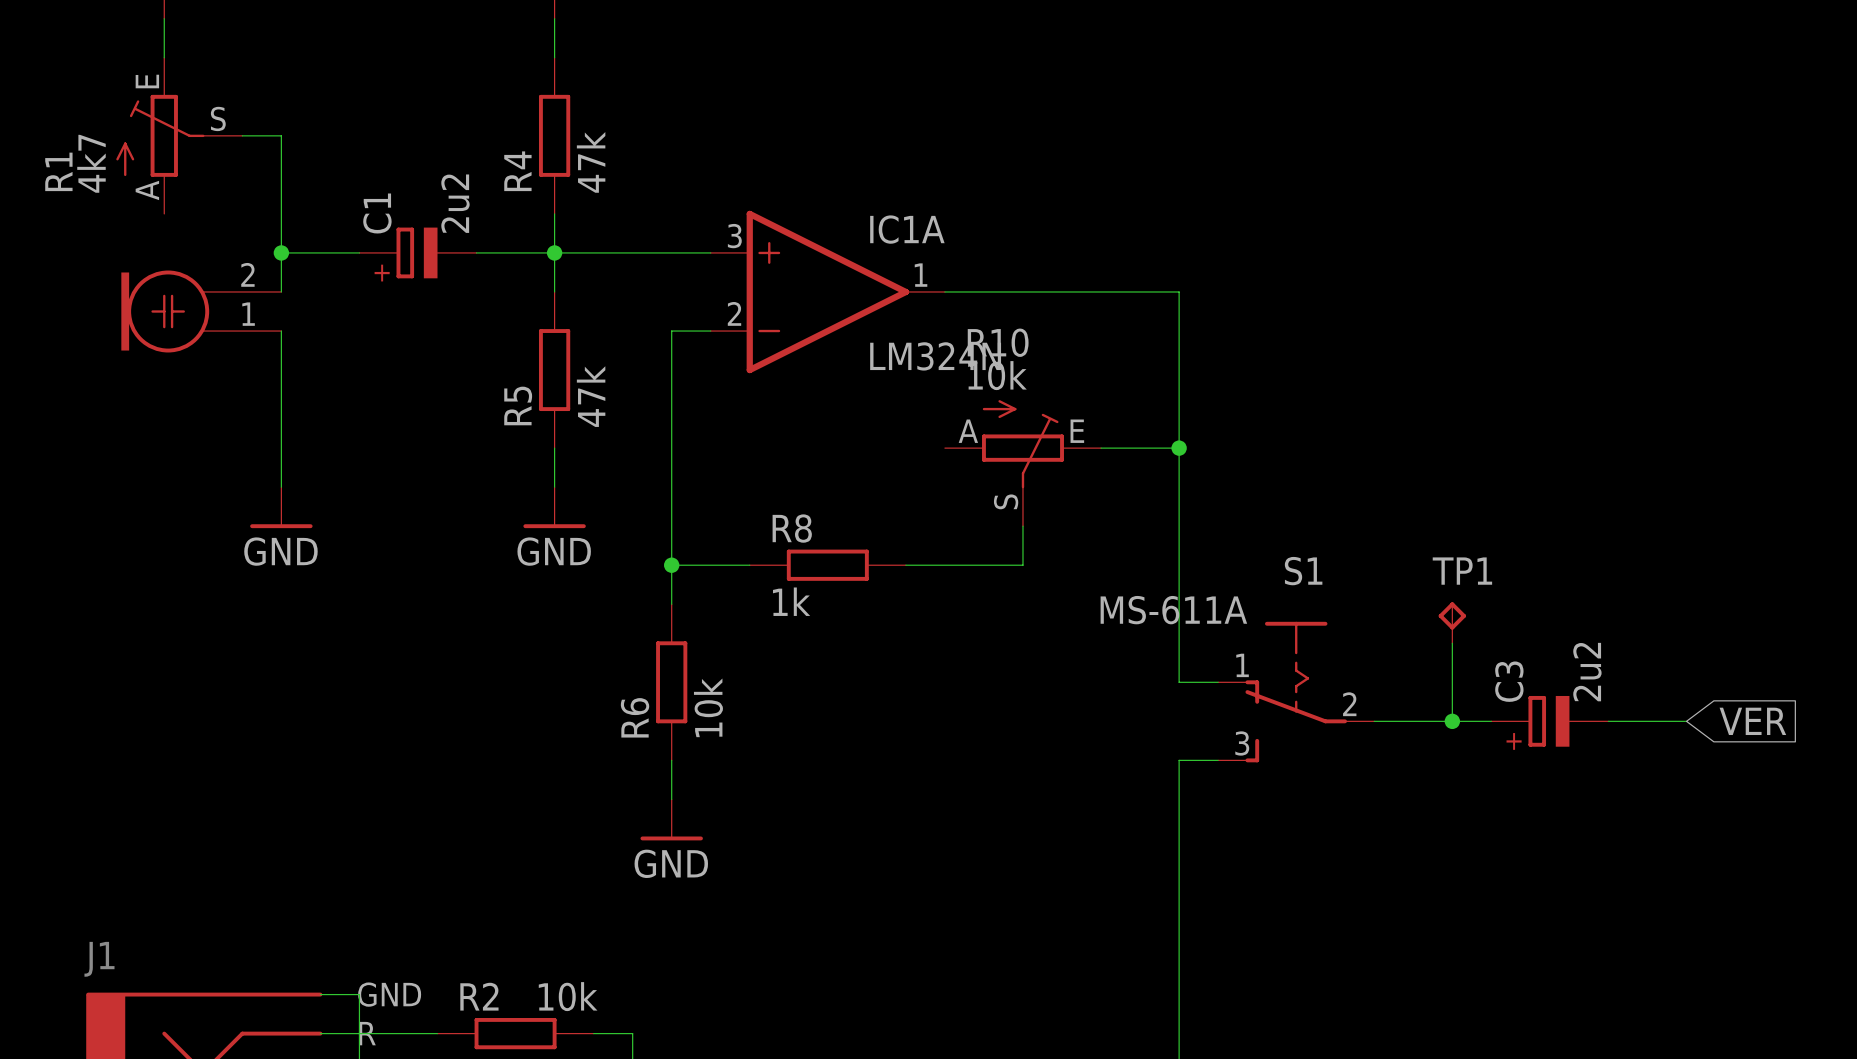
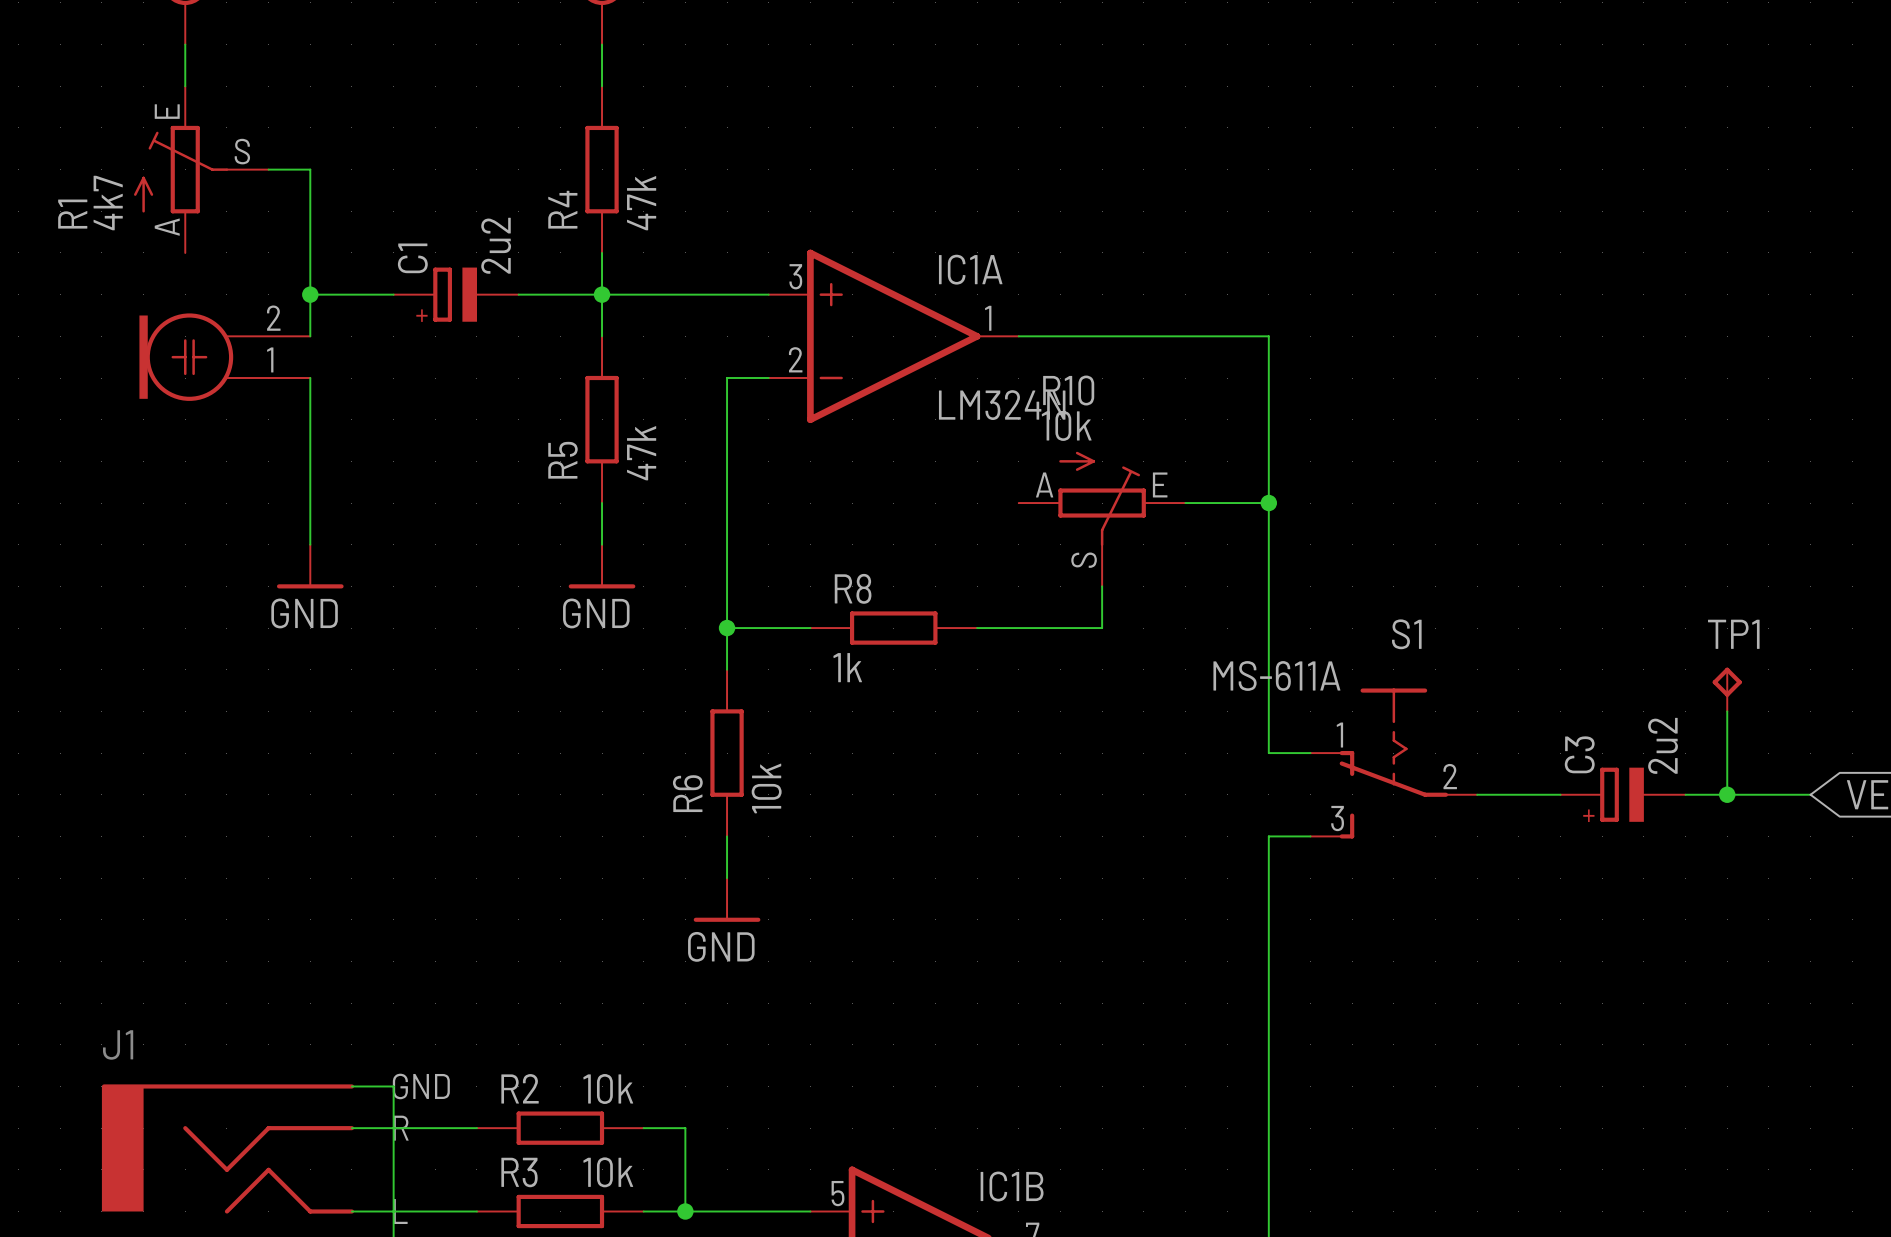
TP1 position: (1452, 622) -> (1727, 689)
wire: (1452, 643) (1452, 721) (1491, 721) -> none
wire: none -> (1727, 711) (1727, 794) (1685, 794)
junction: (1452, 721) -> none
C3 position: (1549, 721) -> (1623, 794)
junction: none -> (1727, 794)

